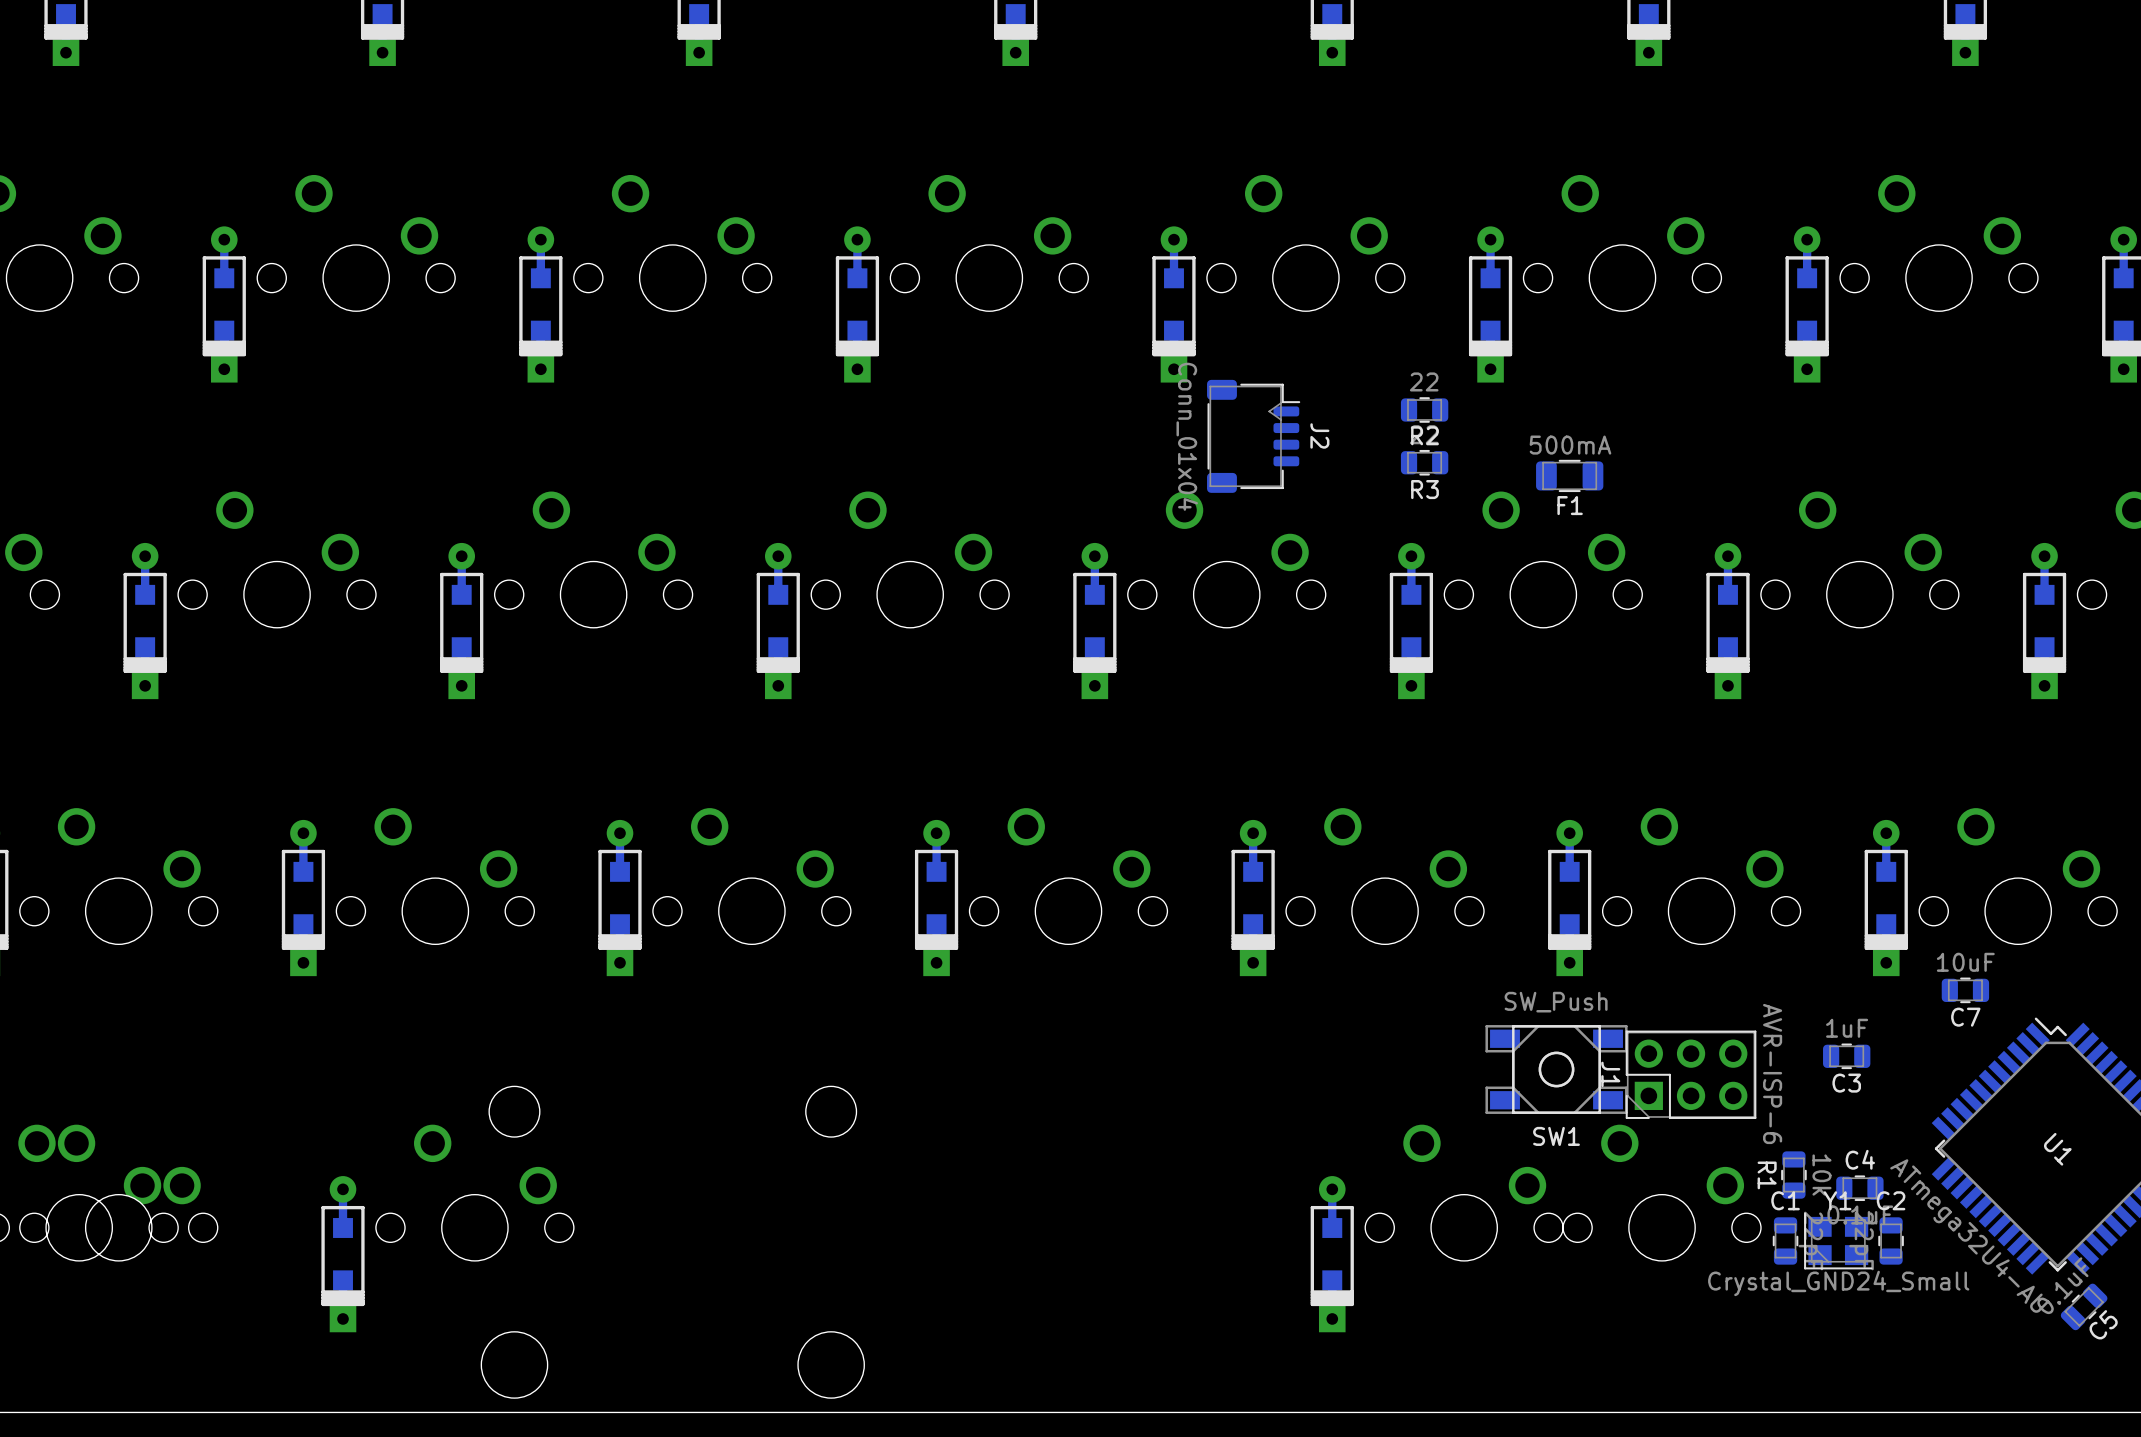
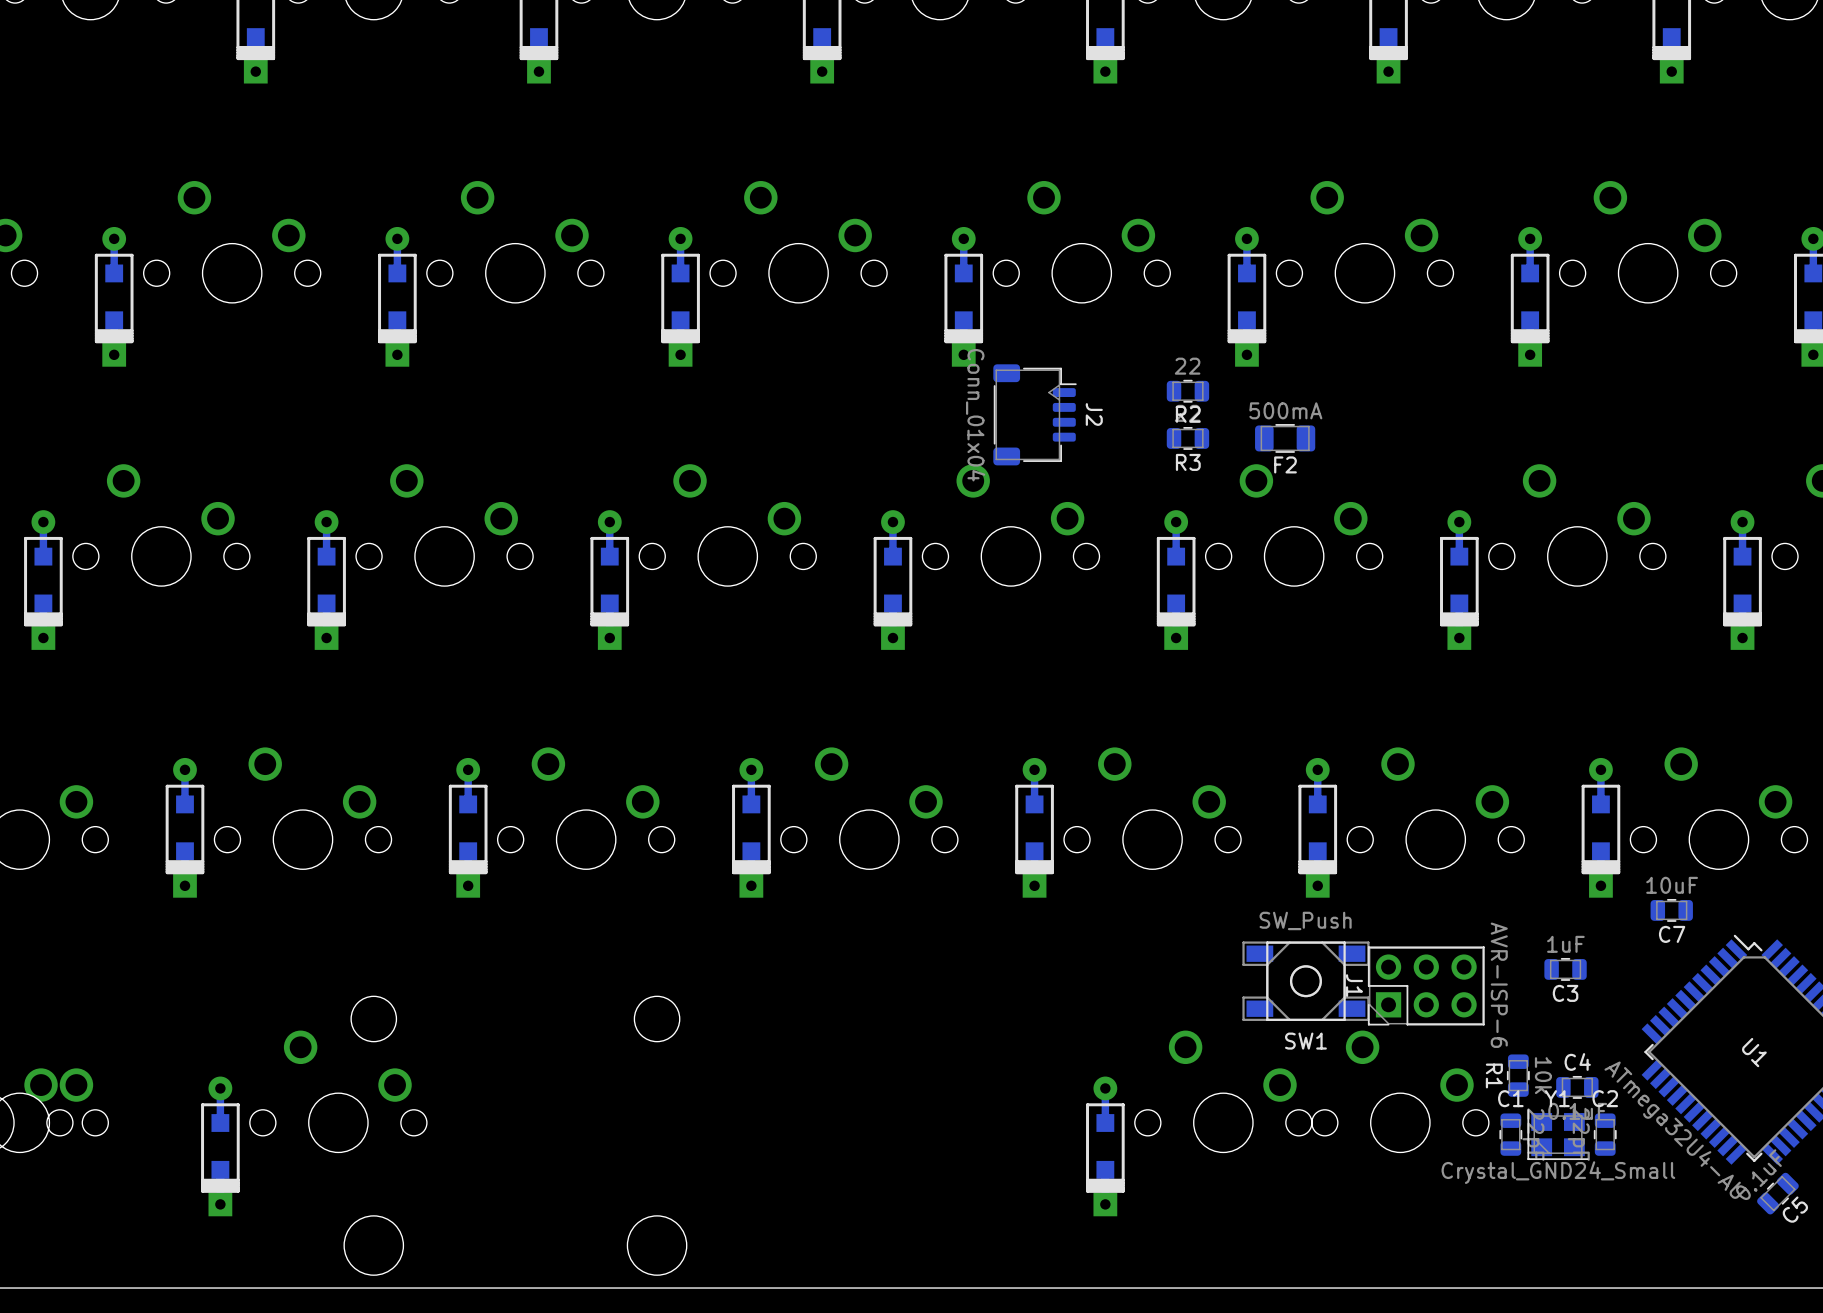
F2: none -> 500mA (1285, 438)
F1: 500mA (1569, 475) -> none

